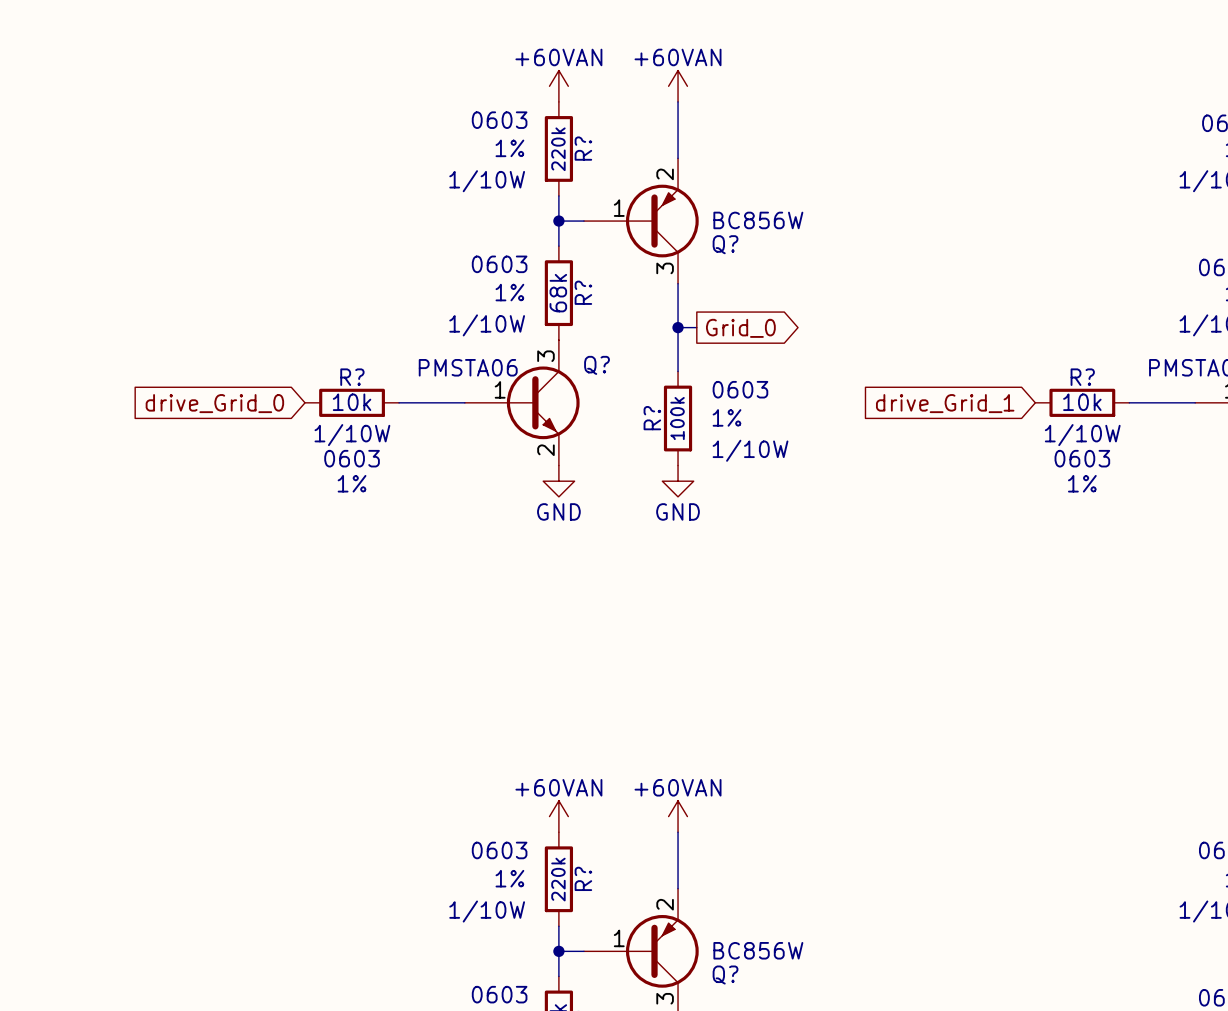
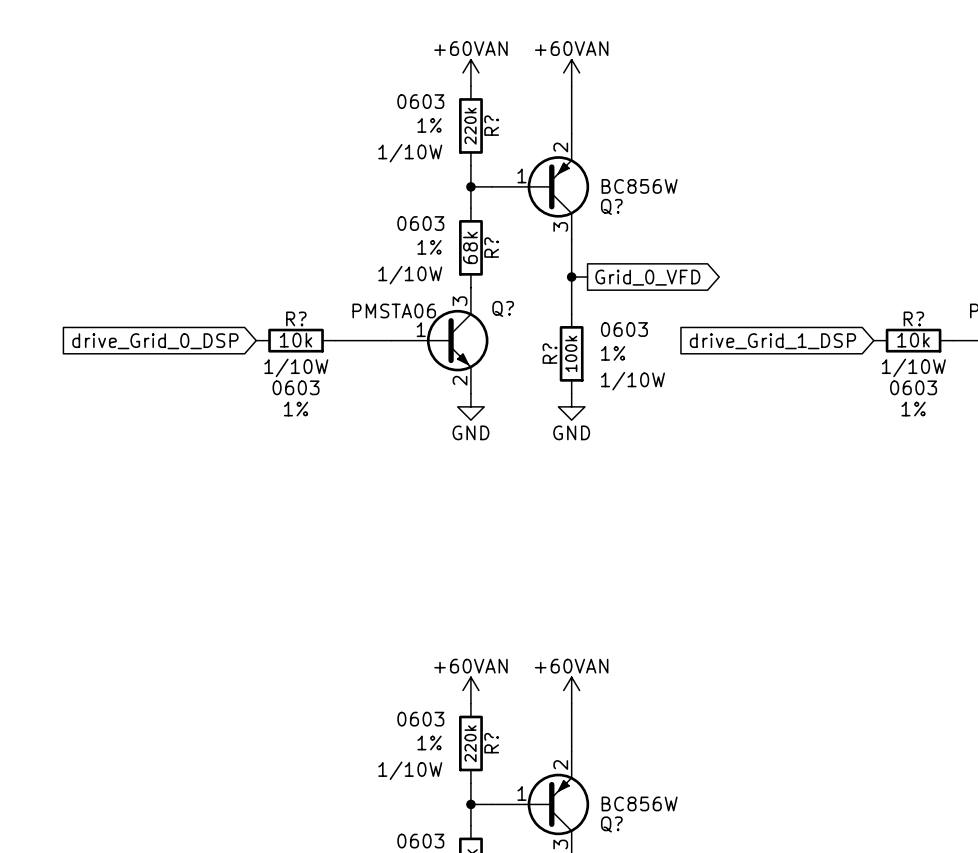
global label: Grid_0 (740, 328) -> Grid_0_VFD (647, 277)
global label: drive_Grid_0 (214, 403) -> drive_Grid_0_DSP (155, 341)
global label: drive_Grid_1 (945, 403) -> drive_Grid_1_DSP (772, 341)

